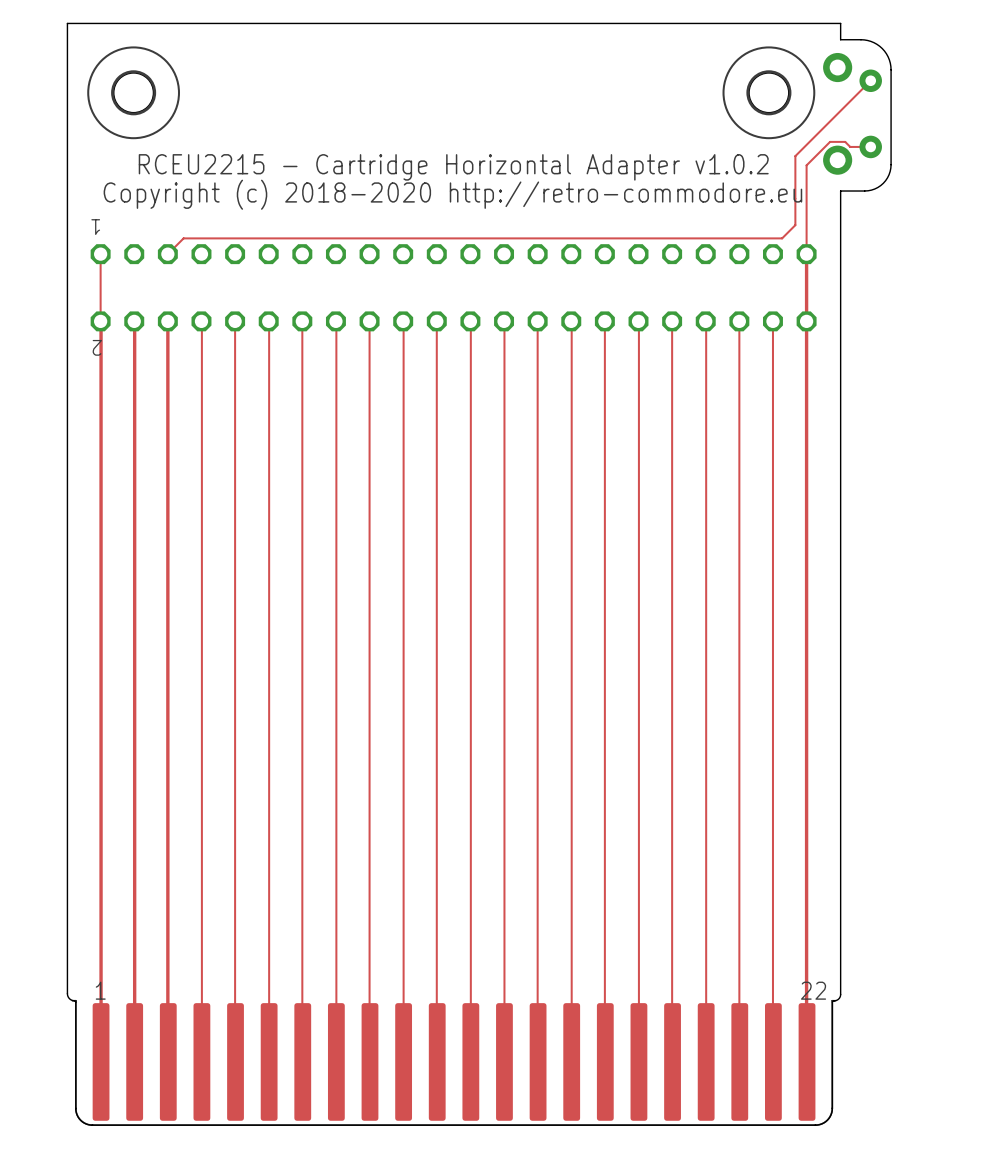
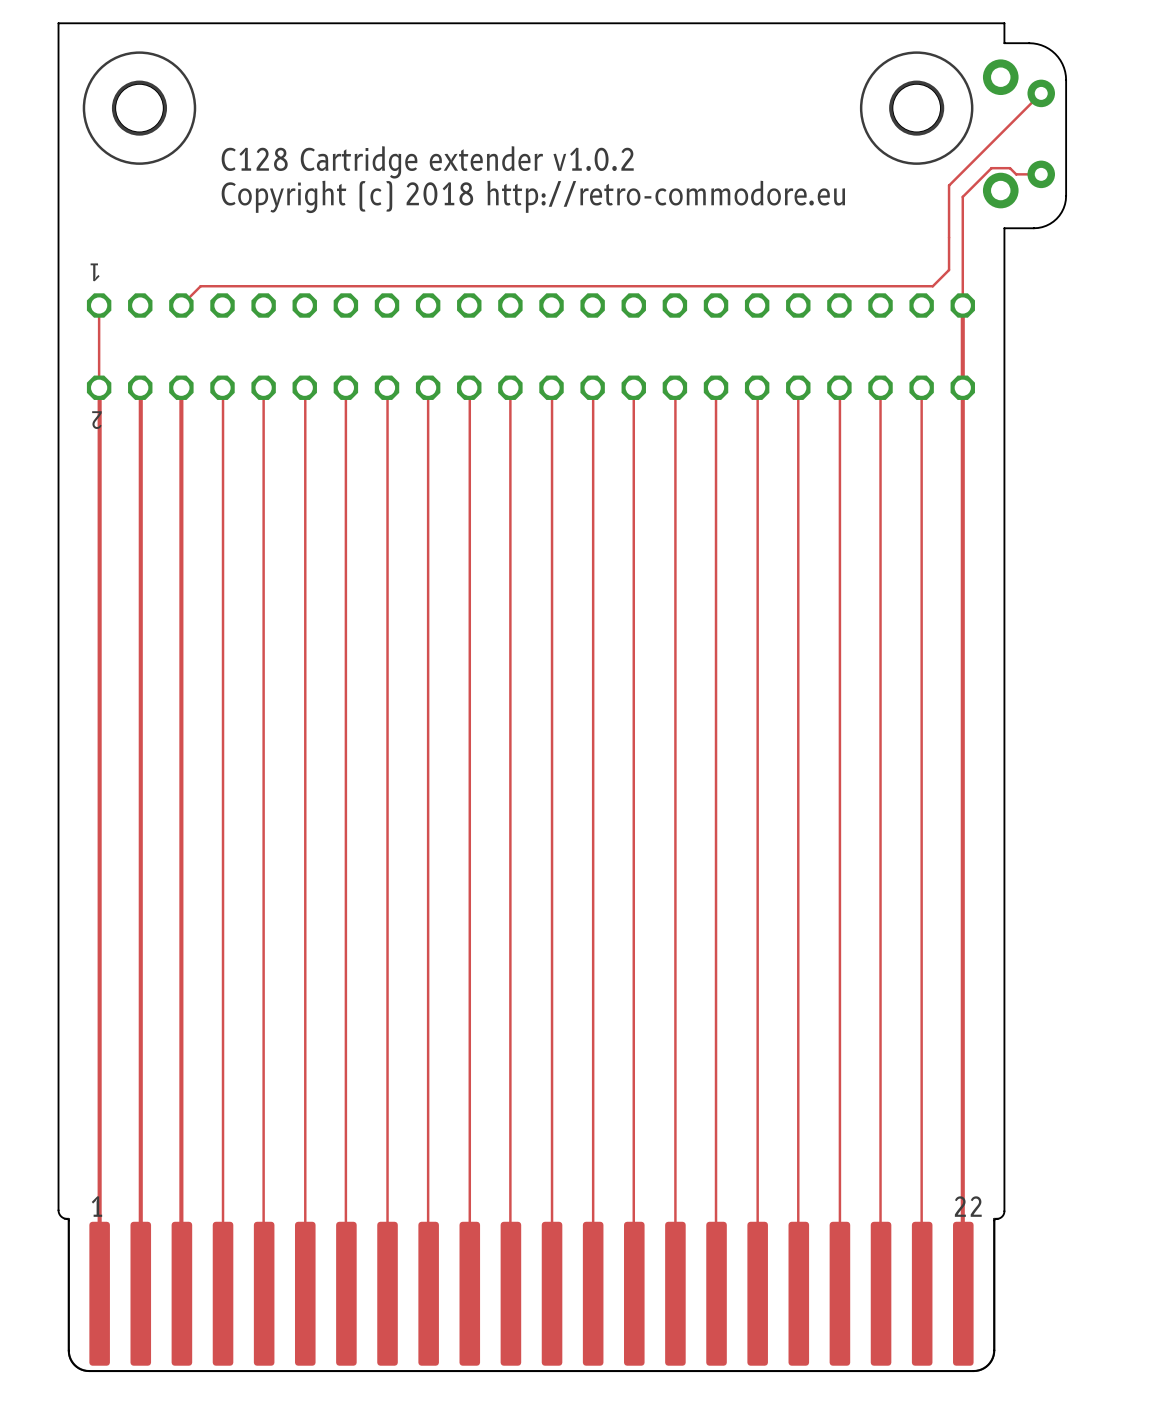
text: RCEU2215 - Cartridge Horizontal Adapter v1.0.2 (453, 167) -> C128 Cartridge extender v1.0.2 (427, 162)
text: Copyright (c) 2018-2020 http://retro-commodore.eu (452, 194) -> Copyright (c) 2018 http://retro-commodore.eu (533, 196)

